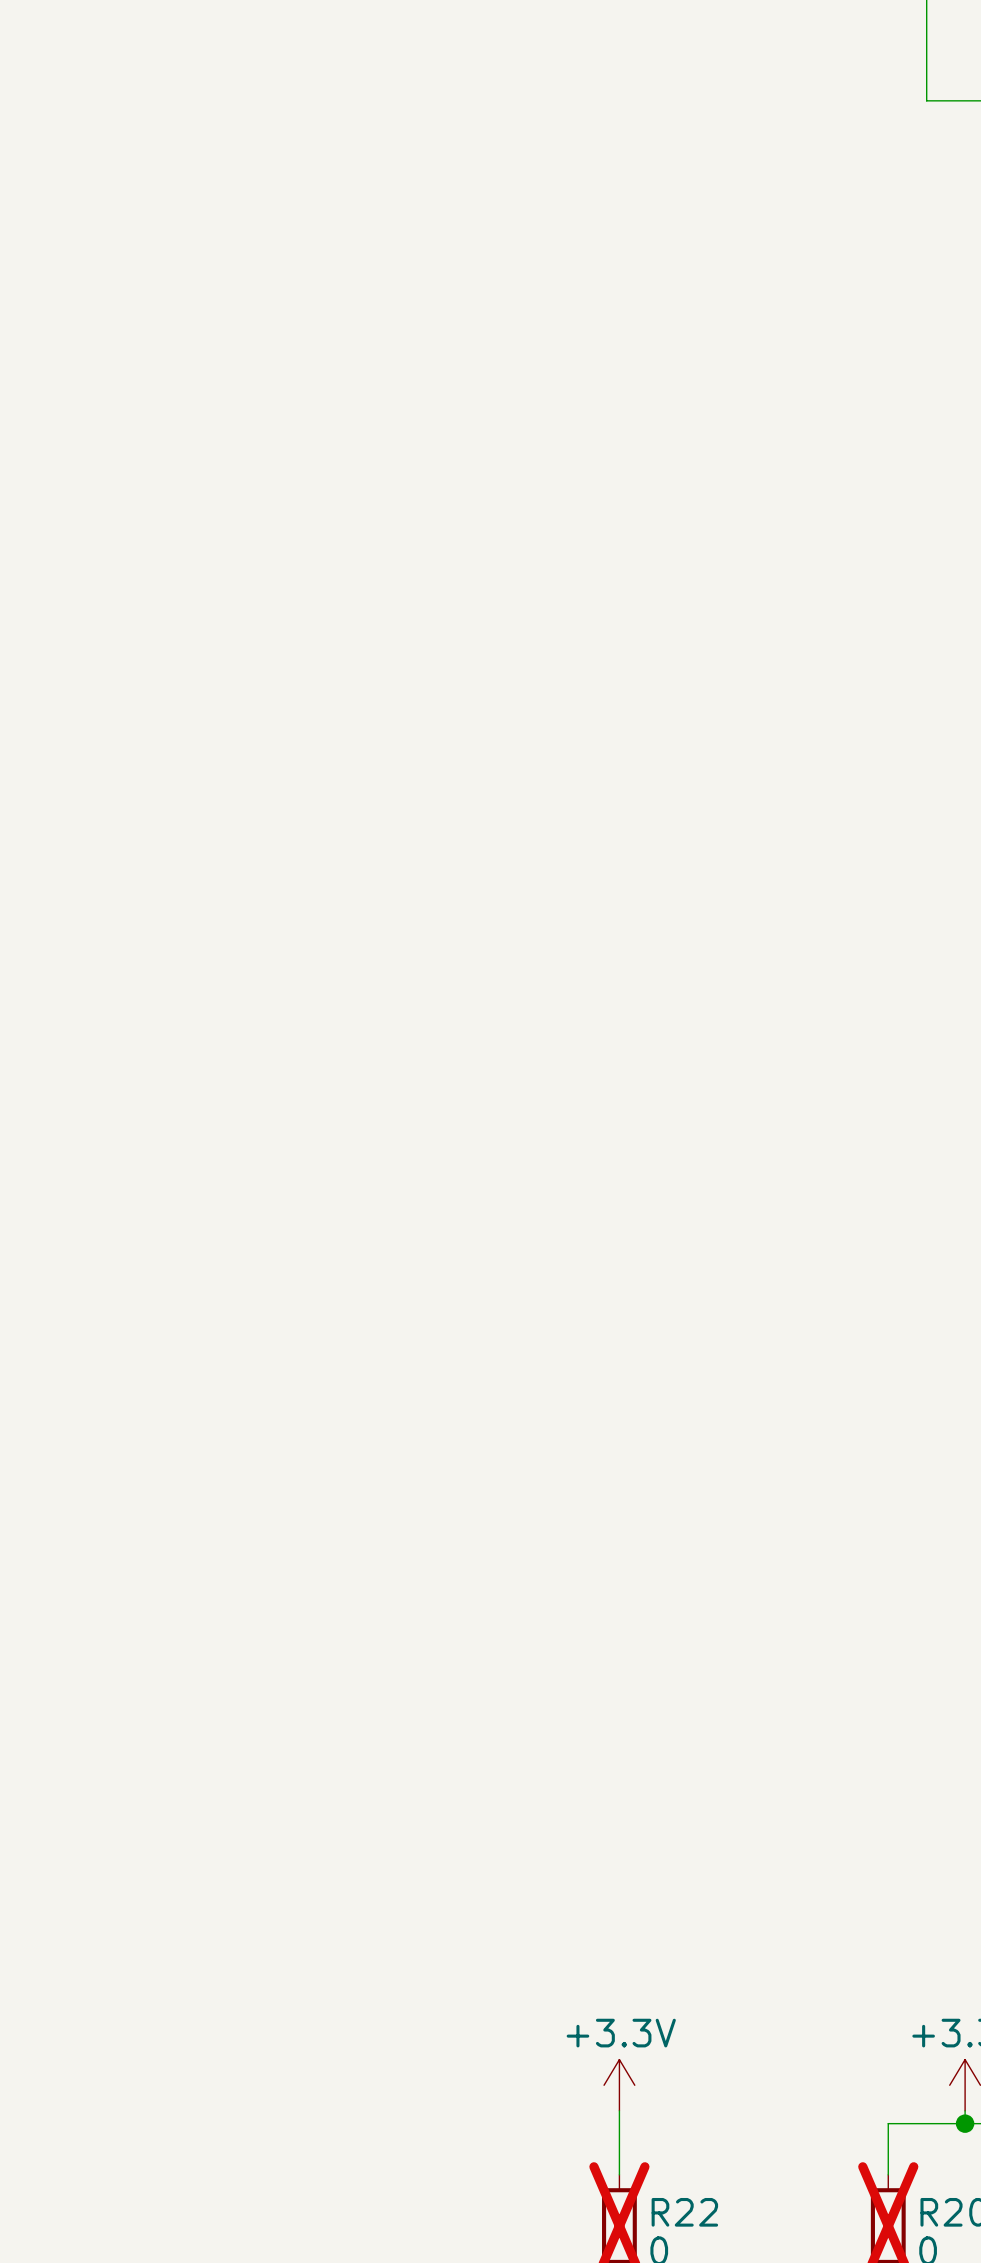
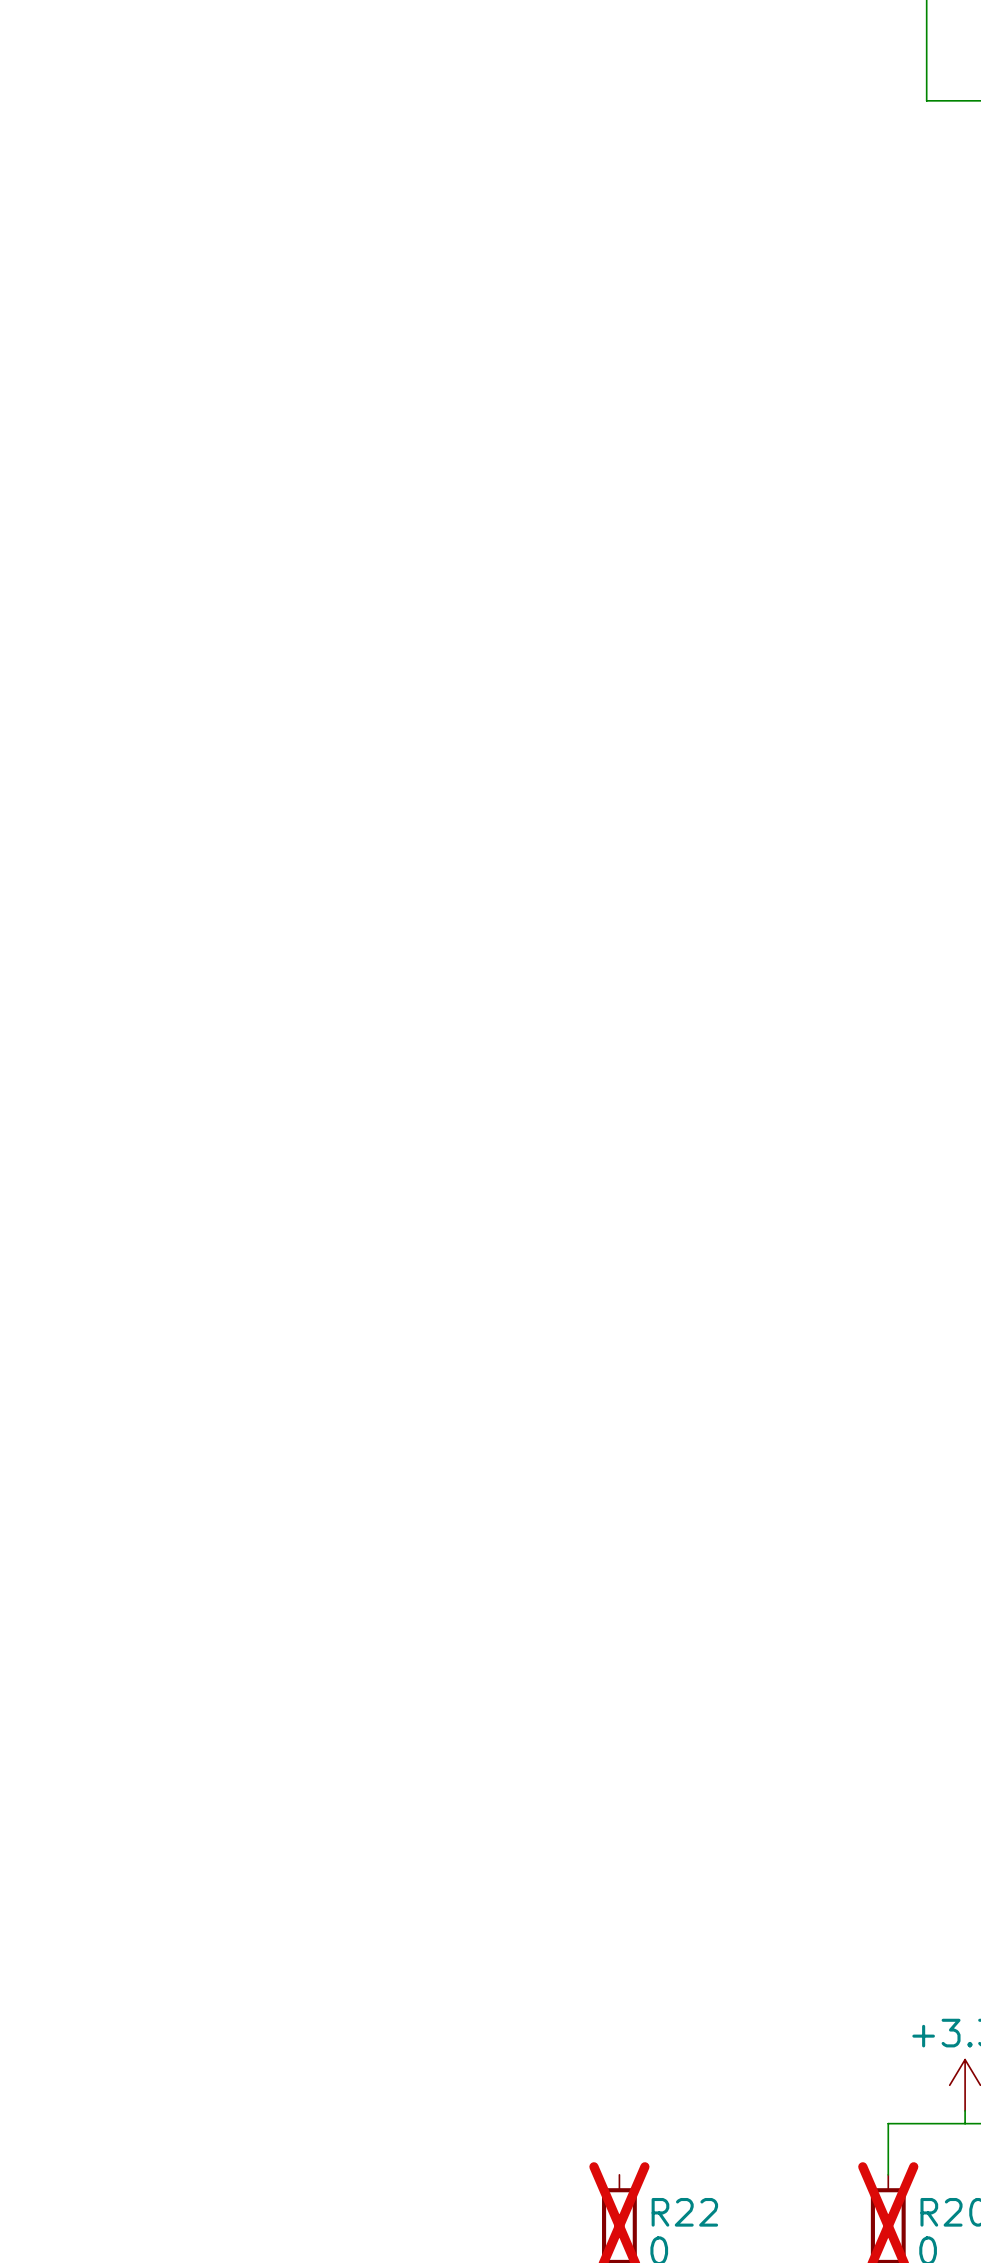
power symbol: +3.3V (619, 2085) -> none
wire: (619, 2110) (619, 2174) -> none
junction: (965, 2123) -> none

